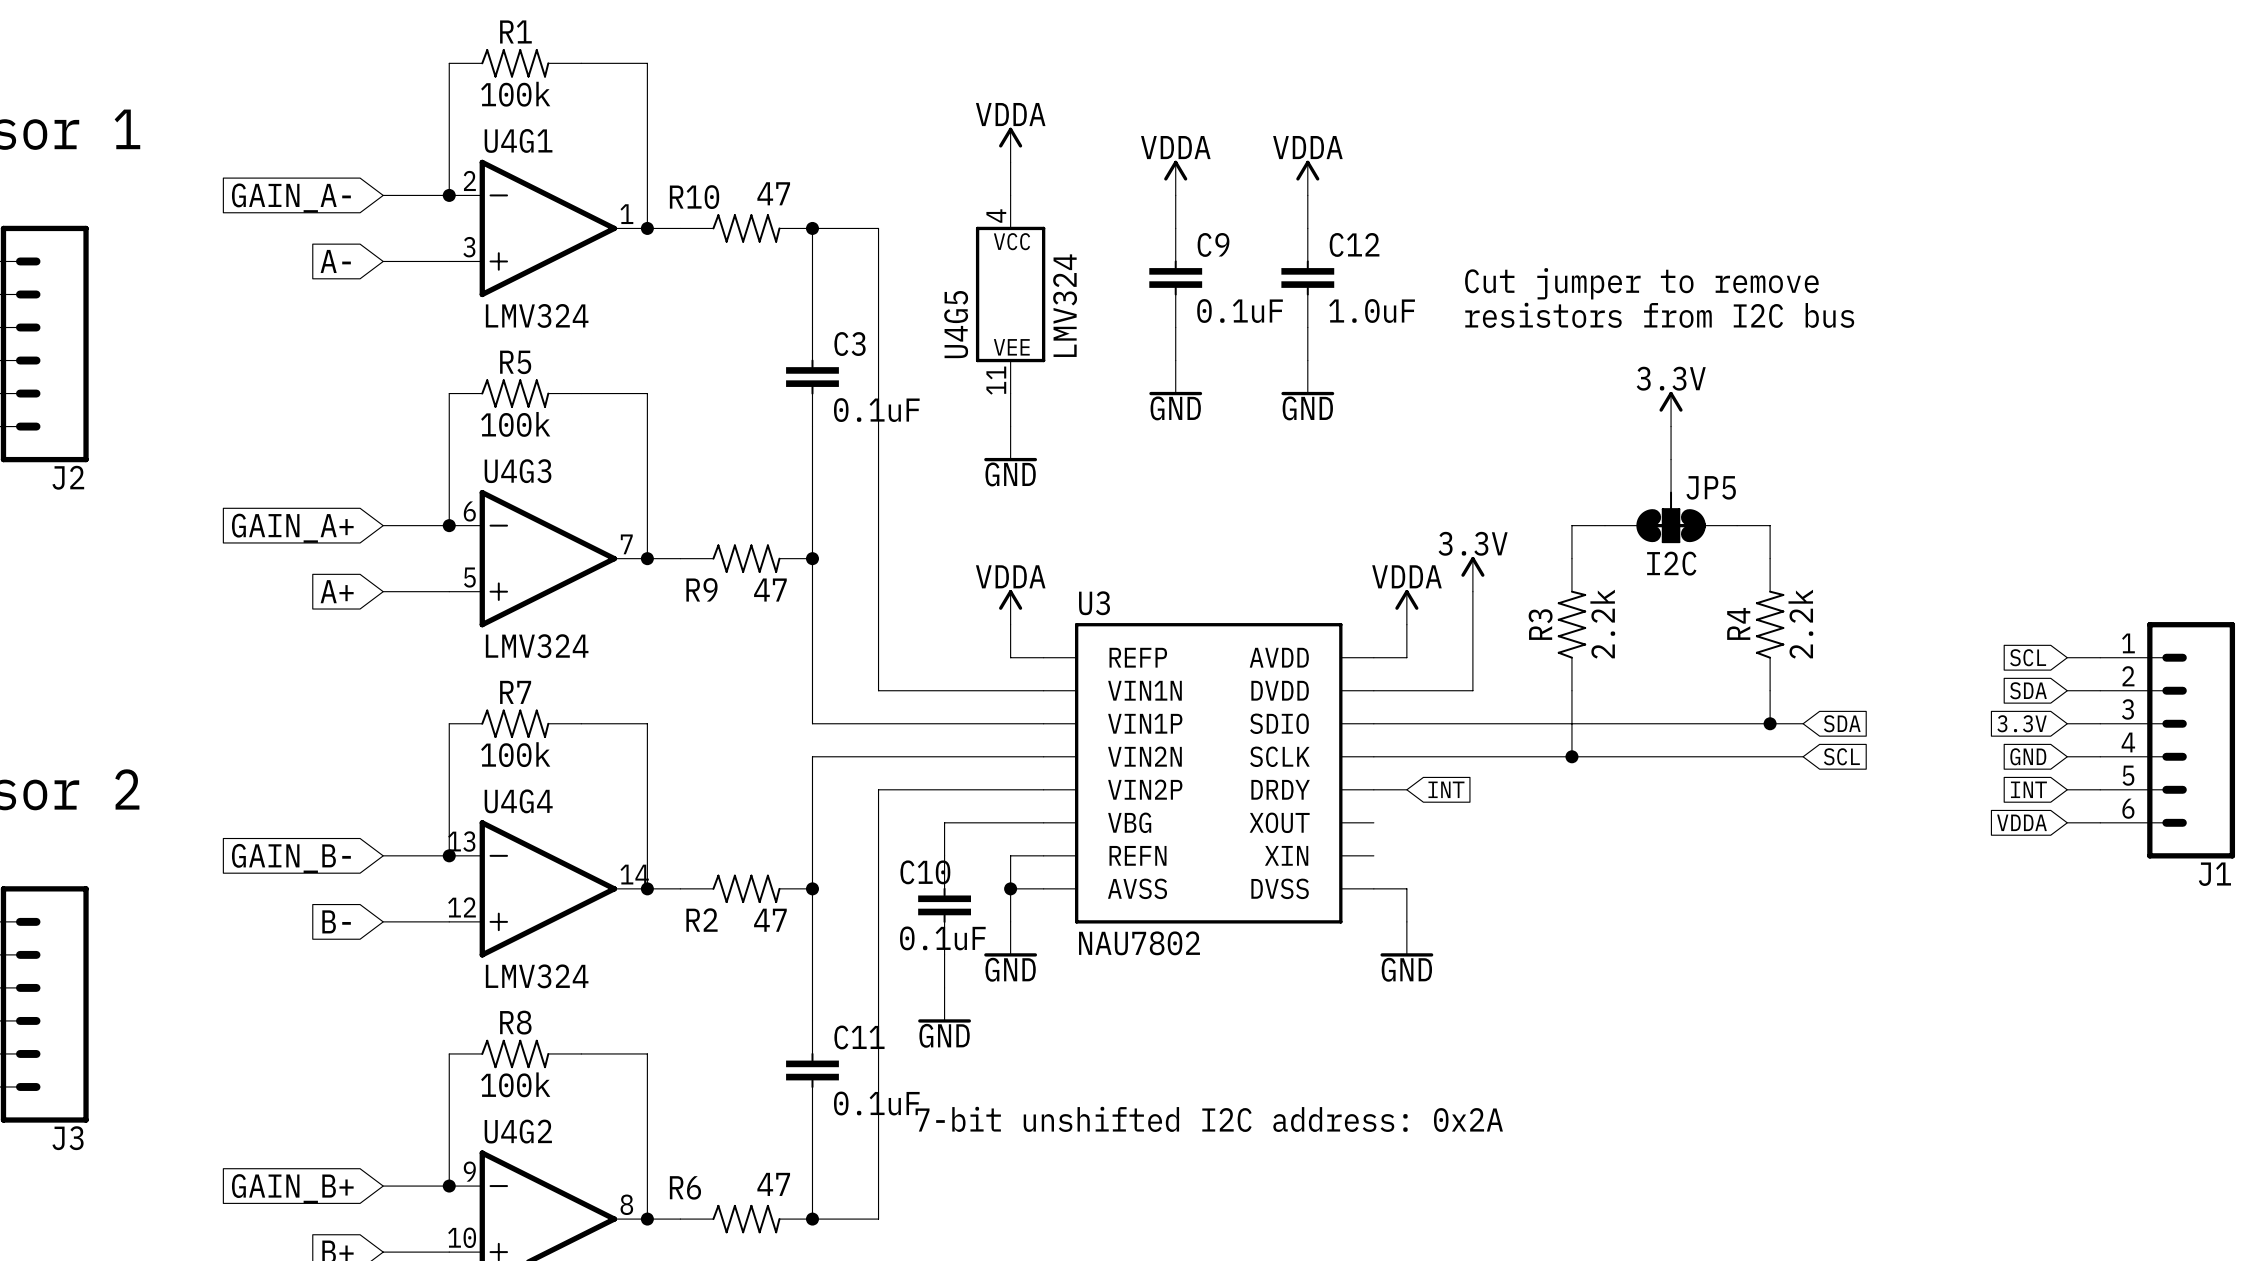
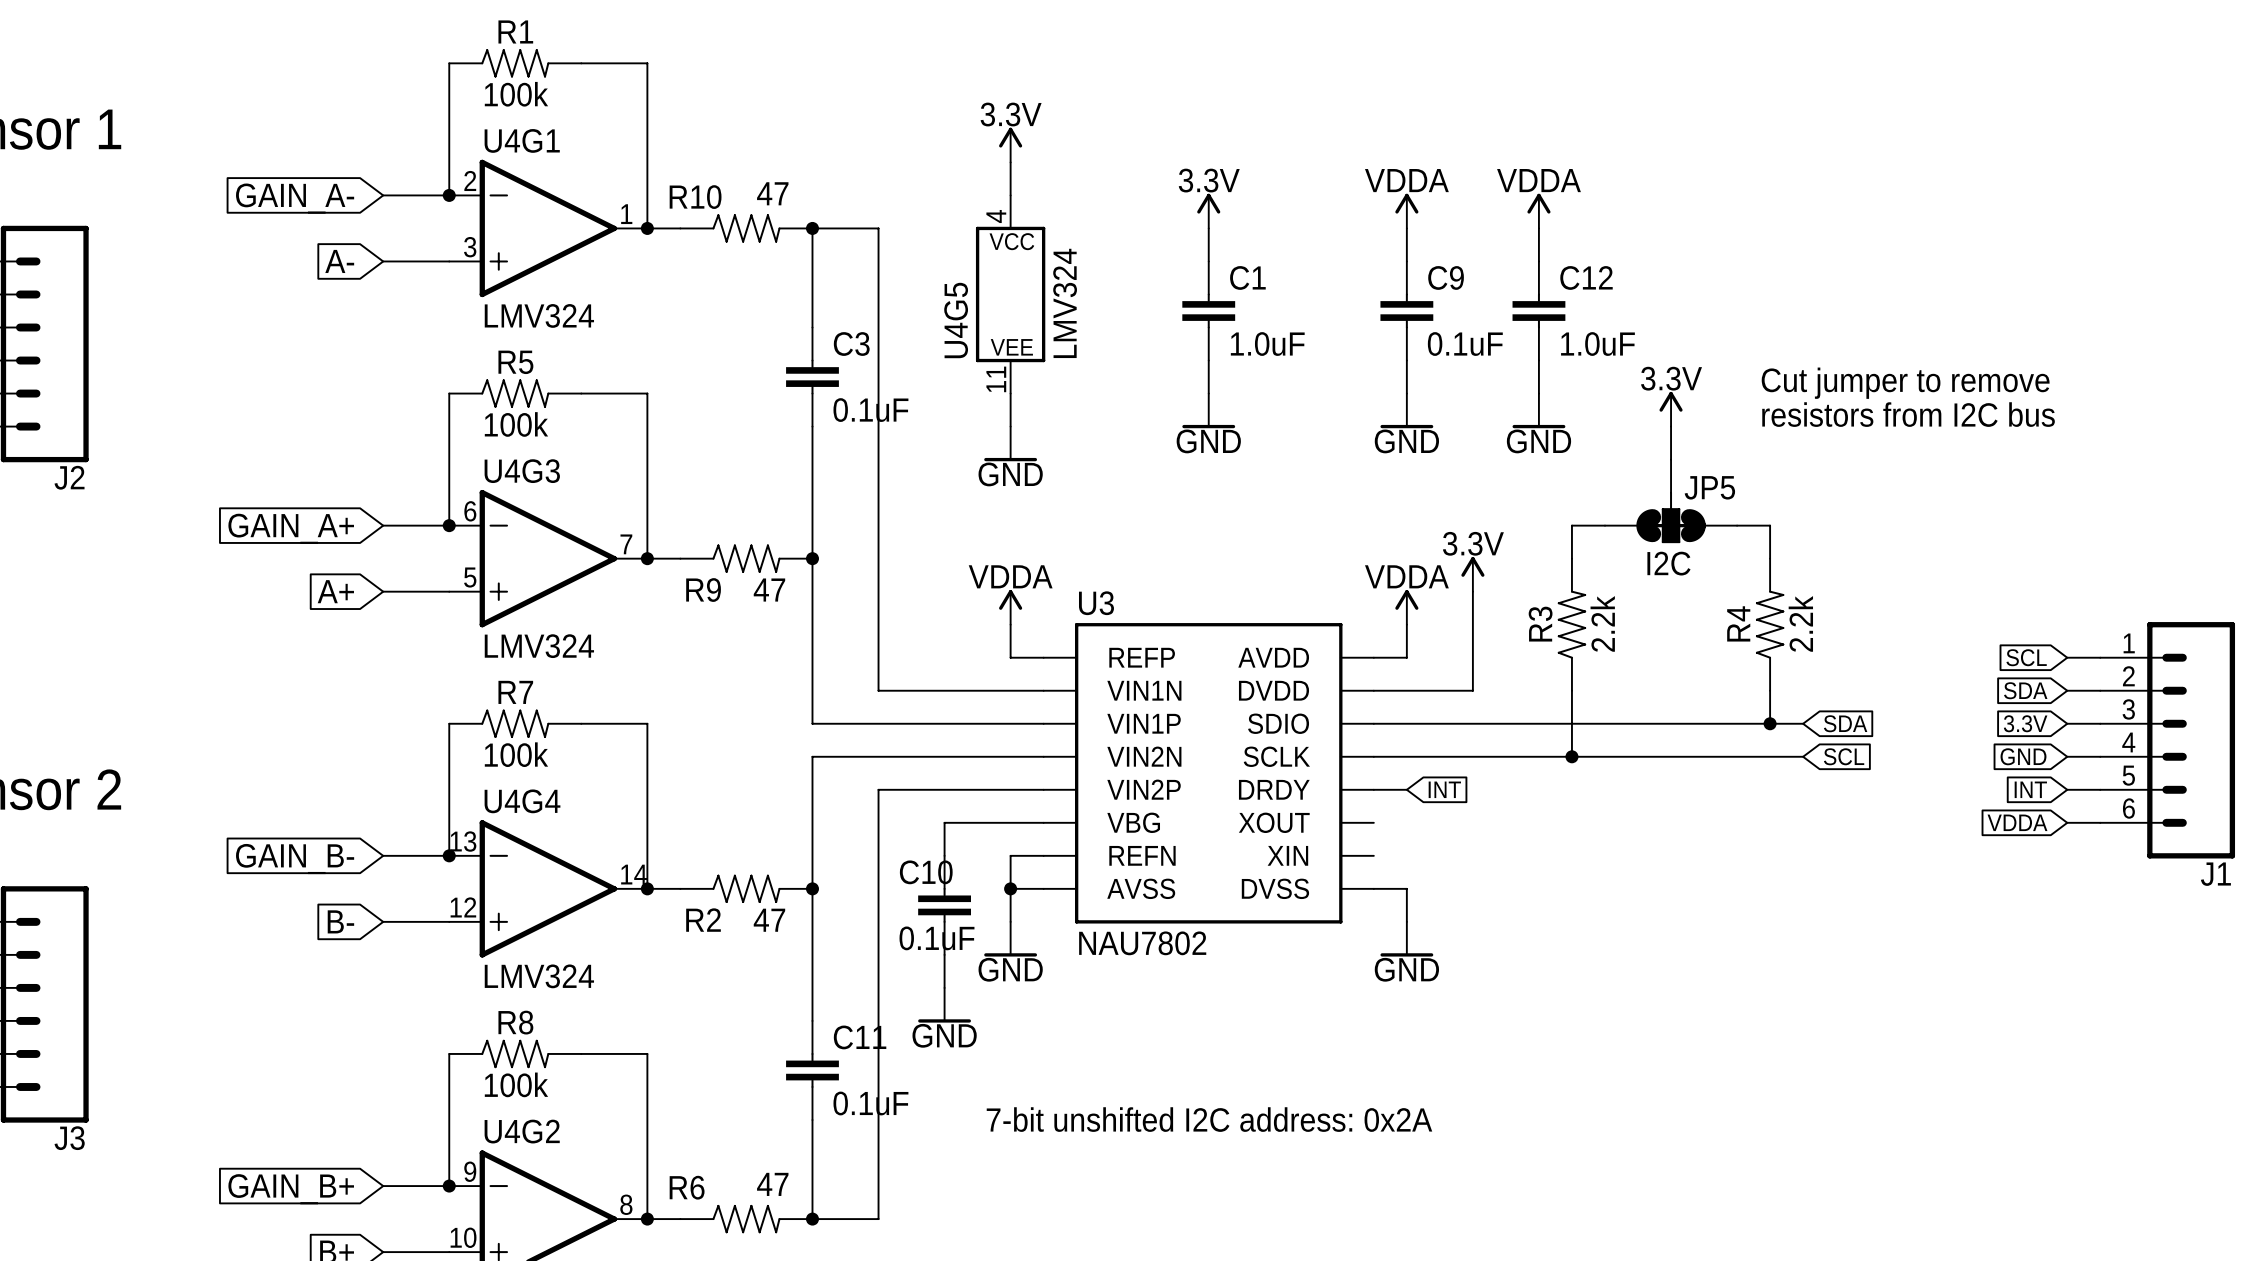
power symbol: VDDA (1010, 145) -> 3.3V (1010, 145)
power symbol: VDDA (1175, 178) -> none
power symbol position: VDDA (1307, 178) -> VDDA (1406, 211)
wire: (1175, 195) (1175, 228) -> (1406, 228) (1406, 261)
wire: (1307, 195) (1307, 228) -> (1538, 228) (1538, 261)
power symbol: none -> 3.3V (1208, 211)
power symbol: none -> VDDA (1538, 211)
wire: none -> (1208, 228) (1208, 261)
C9 position: (1175, 277) -> (1406, 311)
C12 position: (1307, 277) -> (1538, 311)
text position: Cut jumper to remove (1641, 283) -> Cut jumper to remove (1905, 383)
C1: none -> 1.0uF (1208, 311)
text position: resistors from I2C bus (1659, 315) -> resistors from I2C bus (1908, 414)
wire: (1175, 327) (1175, 360) -> (1406, 360) (1406, 393)
wire: (1307, 327) (1307, 360) -> (1538, 360) (1538, 393)
wire: none -> (1208, 360) (1208, 393)
power symbol position: GND (1175, 377) -> GND (1208, 410)
power symbol: GND (1307, 377) -> none
power symbol: none -> GND (1406, 410)
power symbol: none -> GND (1538, 410)

